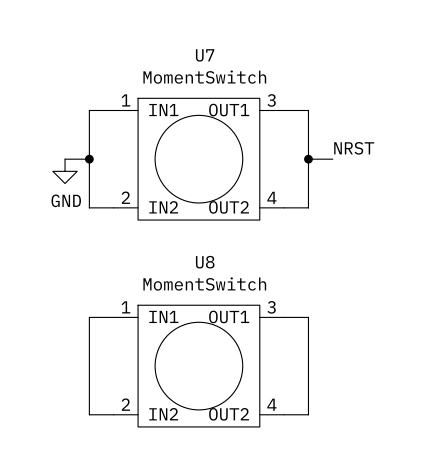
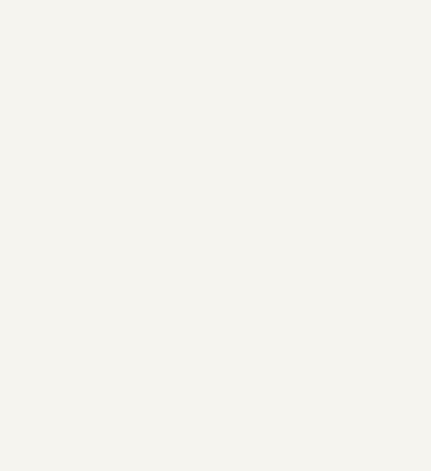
wire: (113, 110) (89, 110) (89, 207) (113, 207) -> none
wire: (284, 110) (308, 110) (308, 207) (284, 207) -> none
label: NRST (354, 148) -> none
wire: (65, 159) (89, 159) -> none
junction: (89, 159) -> none
U7: MomentSwitch (198, 159) -> none
wire: (308, 159) (332, 159) -> none
junction: (308, 159) -> none
power symbol: GND (65, 171) -> none
wire: (113, 317) (89, 317) (89, 414) (113, 414) -> none
wire: (284, 317) (308, 317) (308, 414) (284, 414) -> none
U8: MomentSwitch (198, 366) -> none

